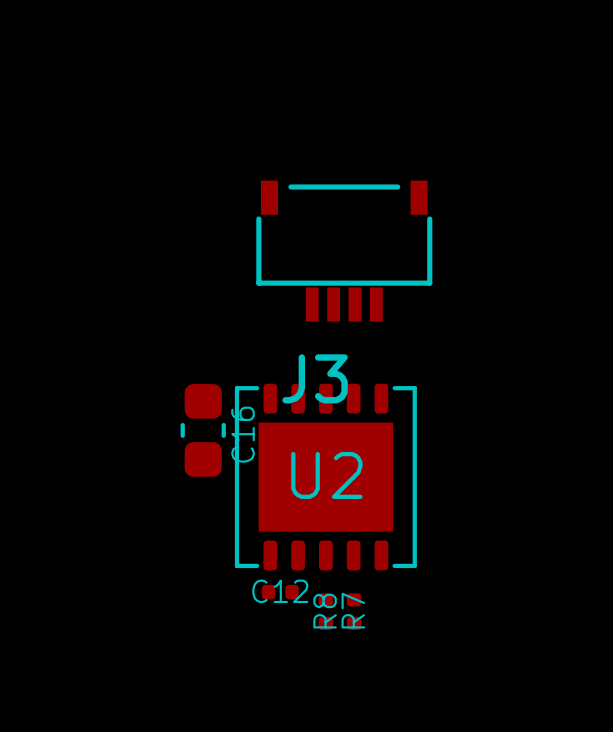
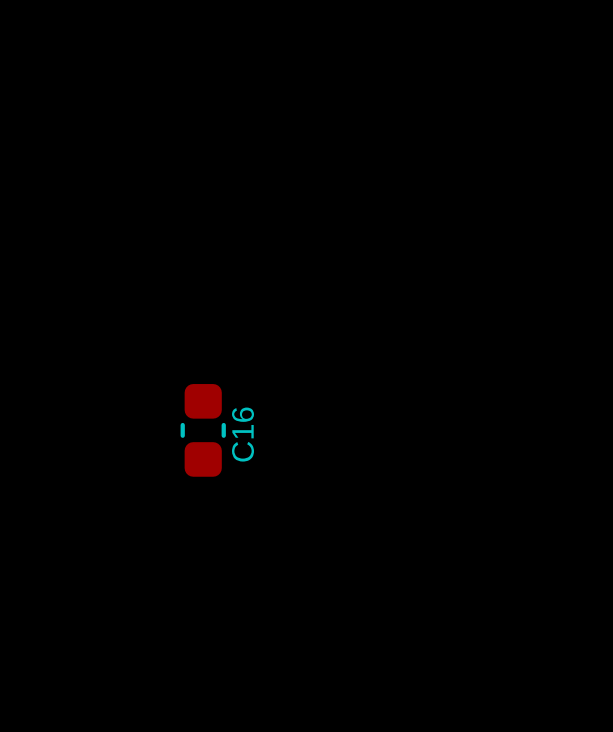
J3: (344, 251) -> none
U2: (325, 477) -> none
C12: (280, 592) -> none
R8: (325, 611) -> none
R7: (354, 611) -> none

